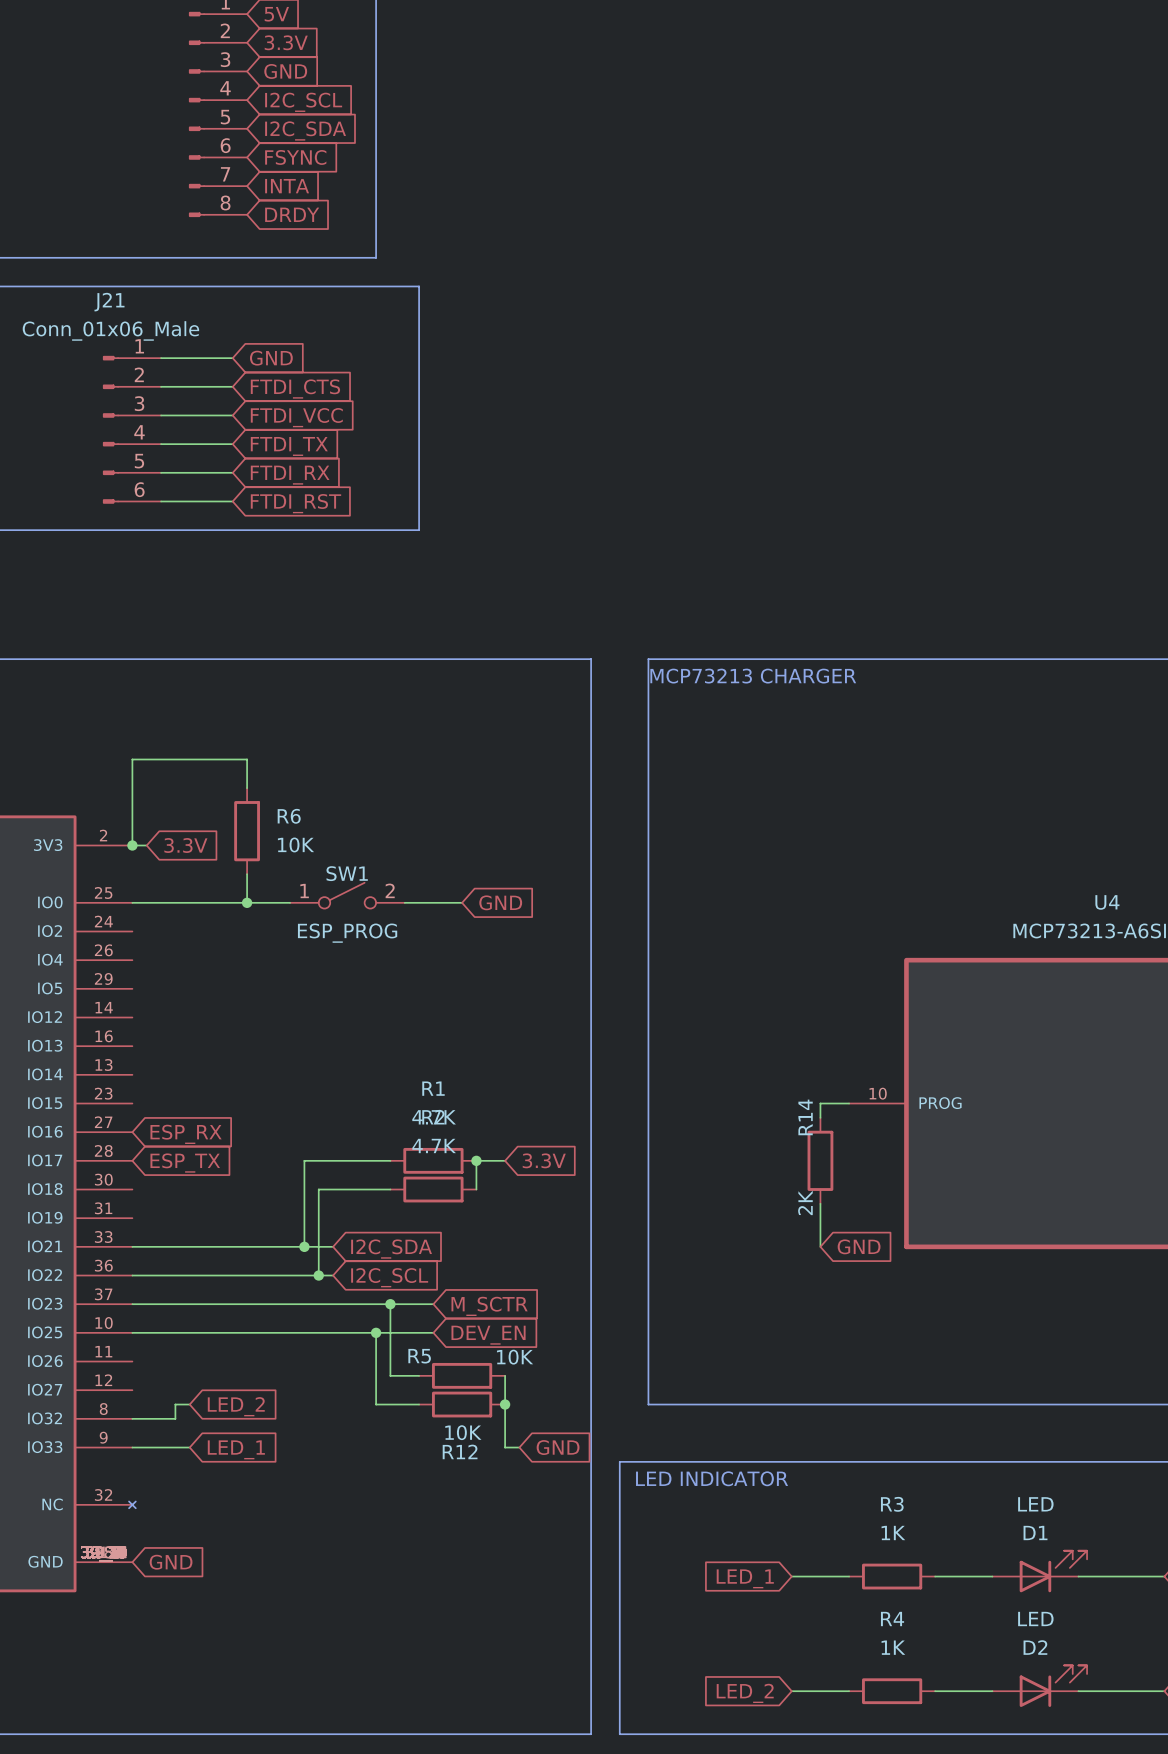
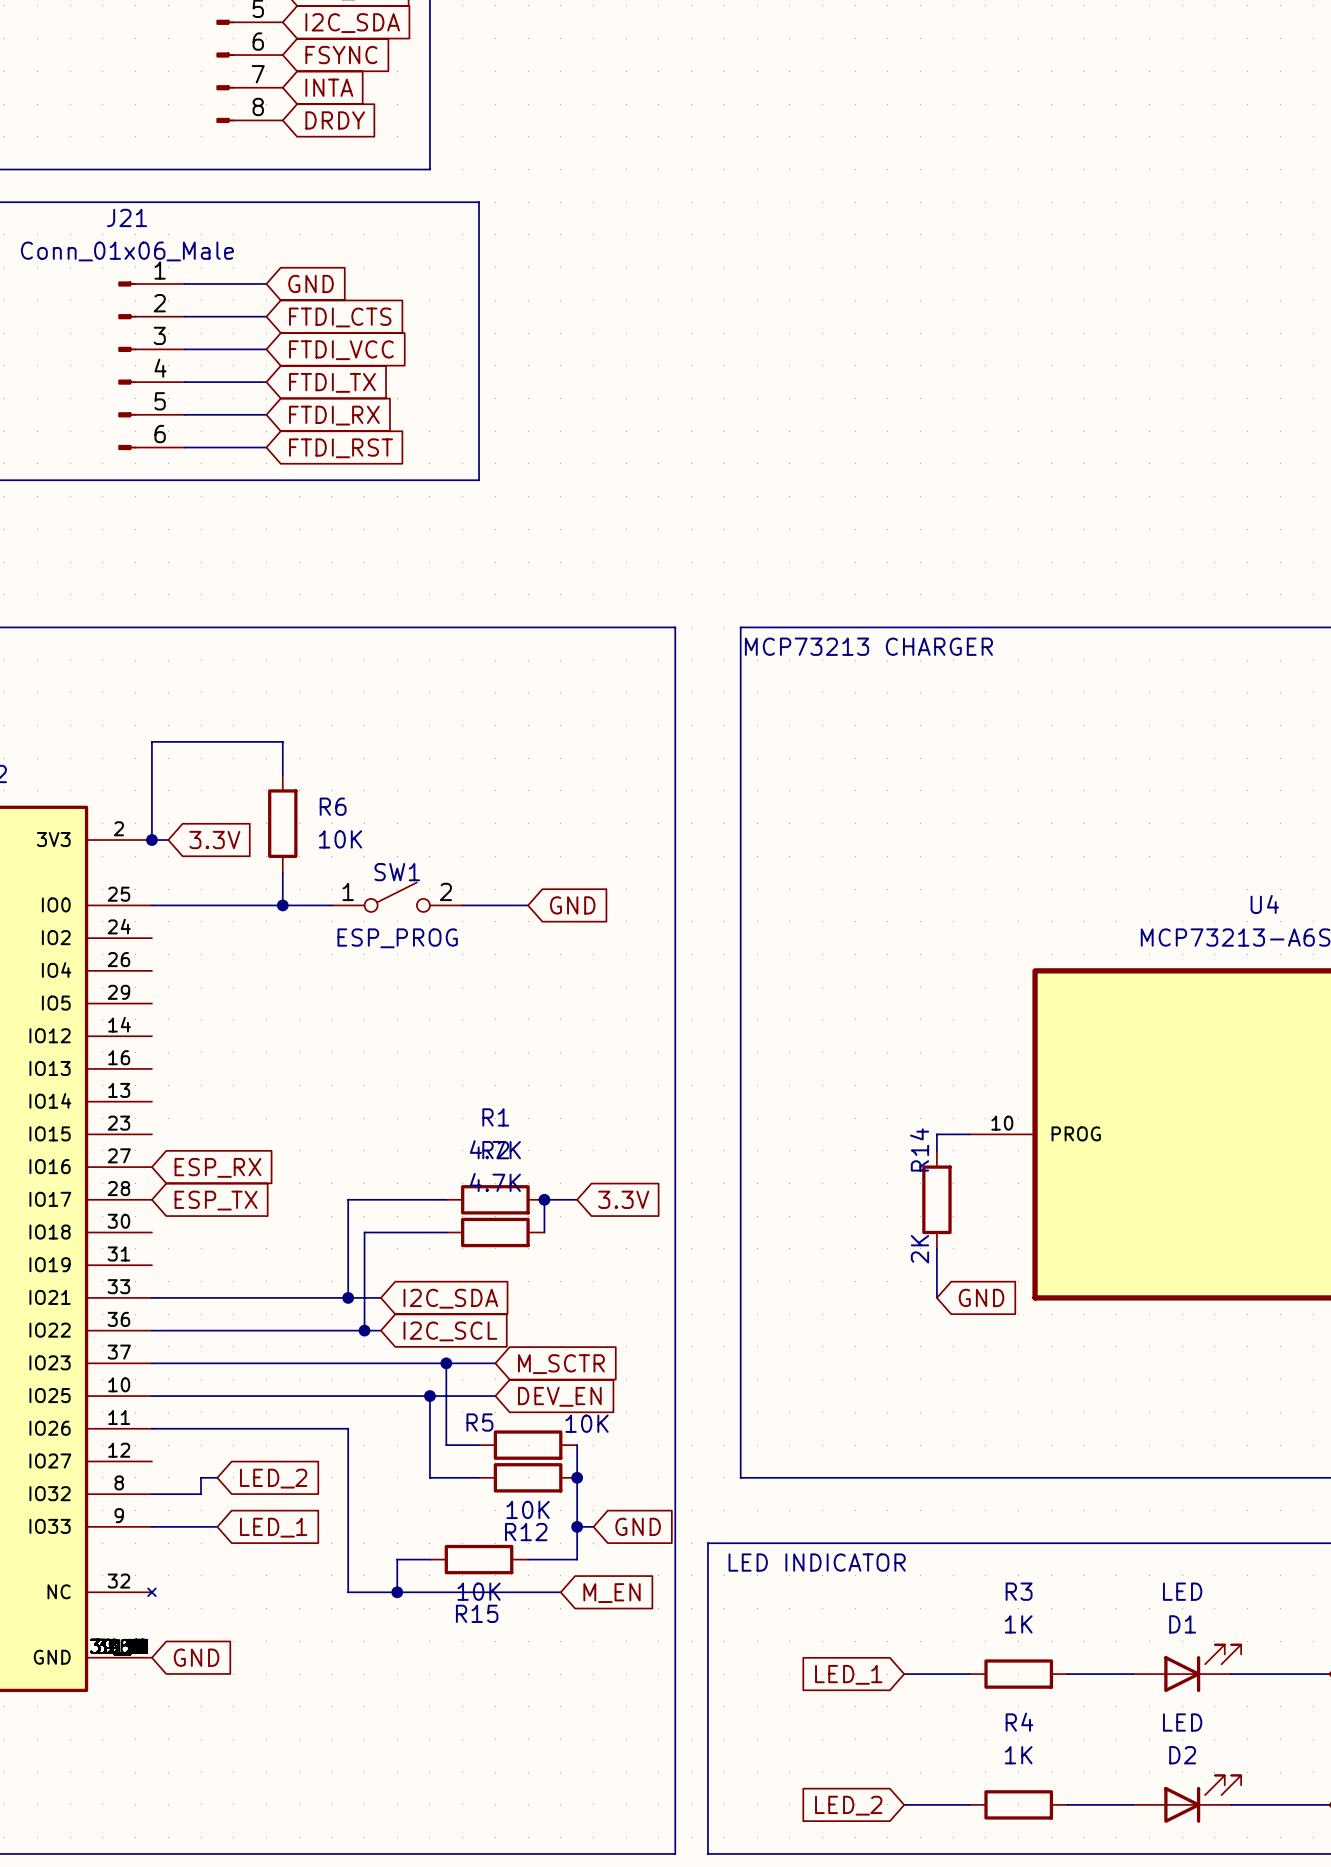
wire: none -> (151, 1428) (348, 1428) (348, 1592) (560, 1592)
wire: none -> (577, 1526) (577, 1559) (528, 1559)
junction: none -> (577, 1526)
wire: none -> (429, 1559) (397, 1559) (397, 1592)
R15: none -> 10K (479, 1559)
junction: none -> (397, 1592)
global label: none -> M_EN (612, 1593)

